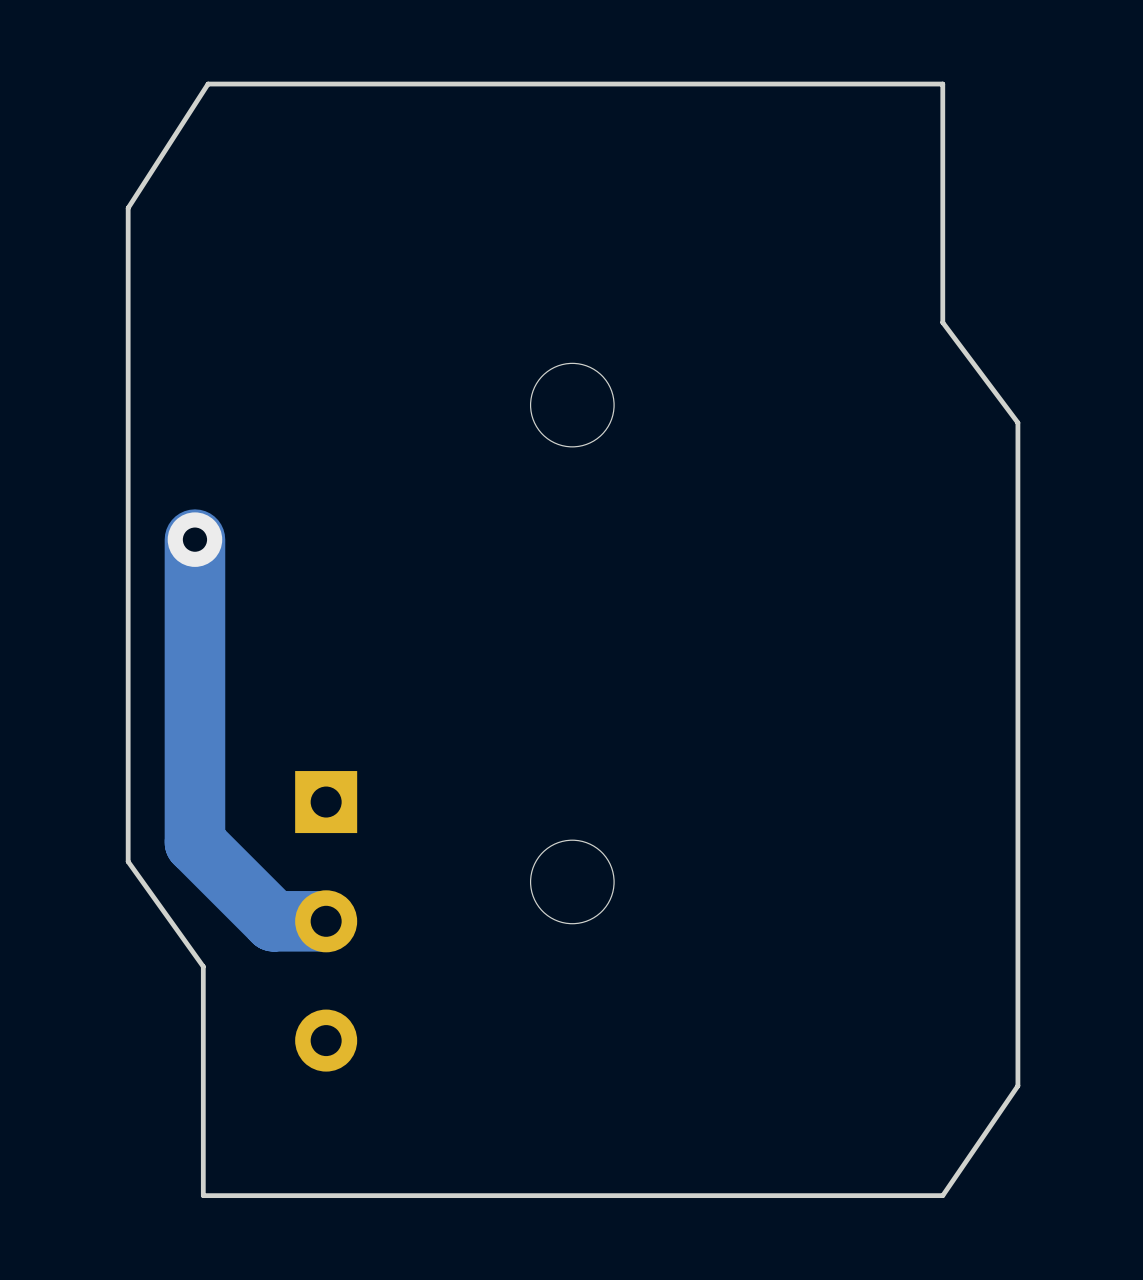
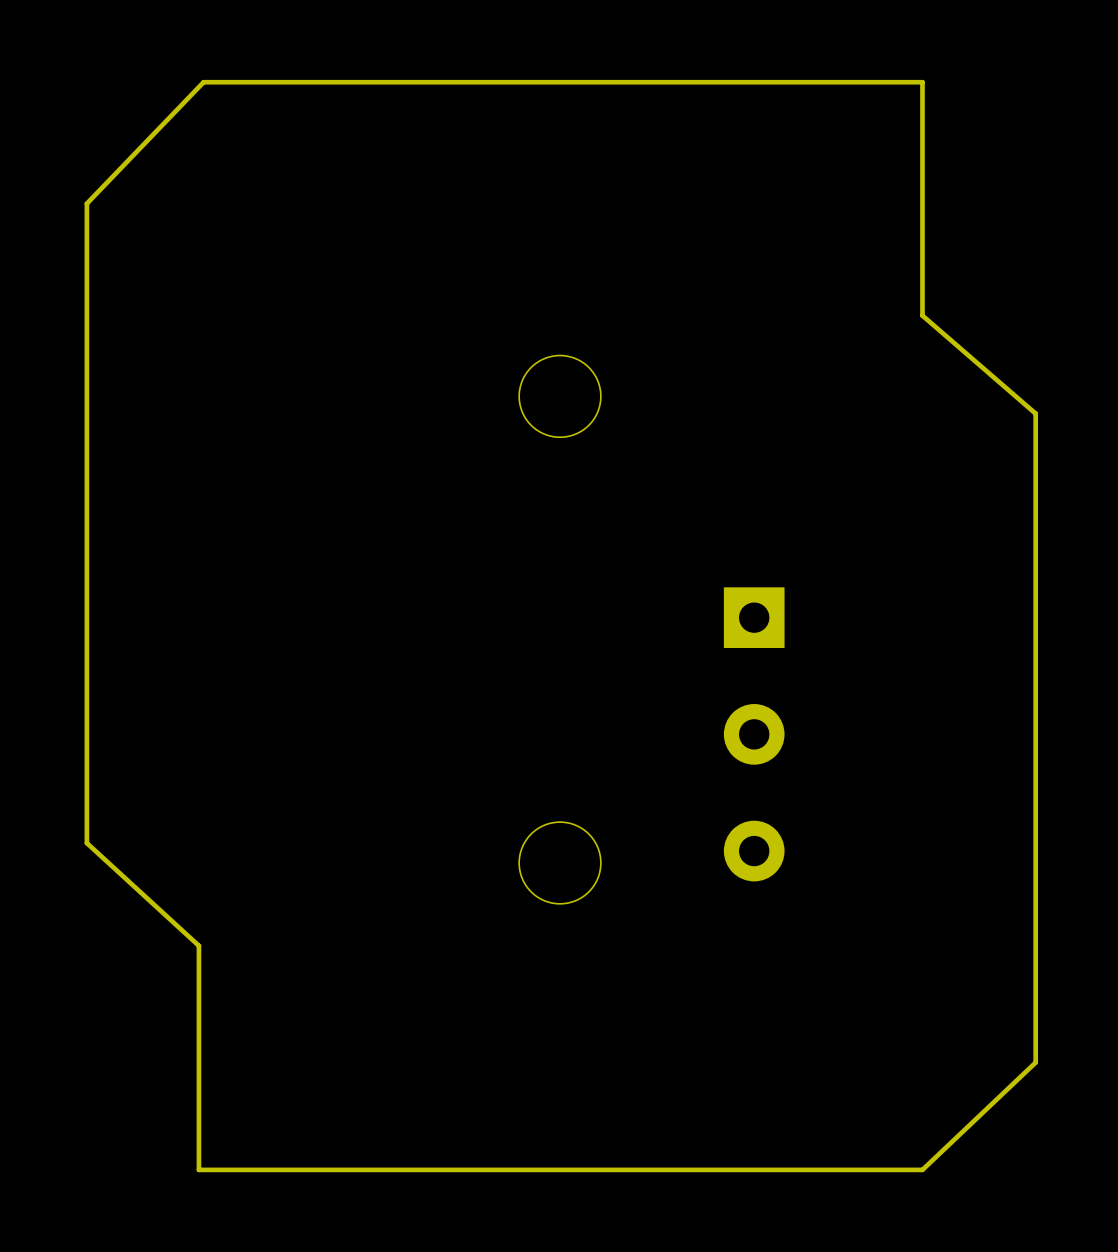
board edge: (208, 84) (128, 208) (128, 861) (203, 966) -> (203, 82) (86, 203) (86, 843) (198, 945)
board edge: (942, 322) (1017, 422) (1017, 1085) (942, 1195) -> (922, 315) (1035, 413) (1035, 1062) (922, 1169)
track: (194, 539) (194, 842) (273, 921) (326, 921) -> none
via: (194, 539) -> none
part position: (326, 921) -> (754, 734)

